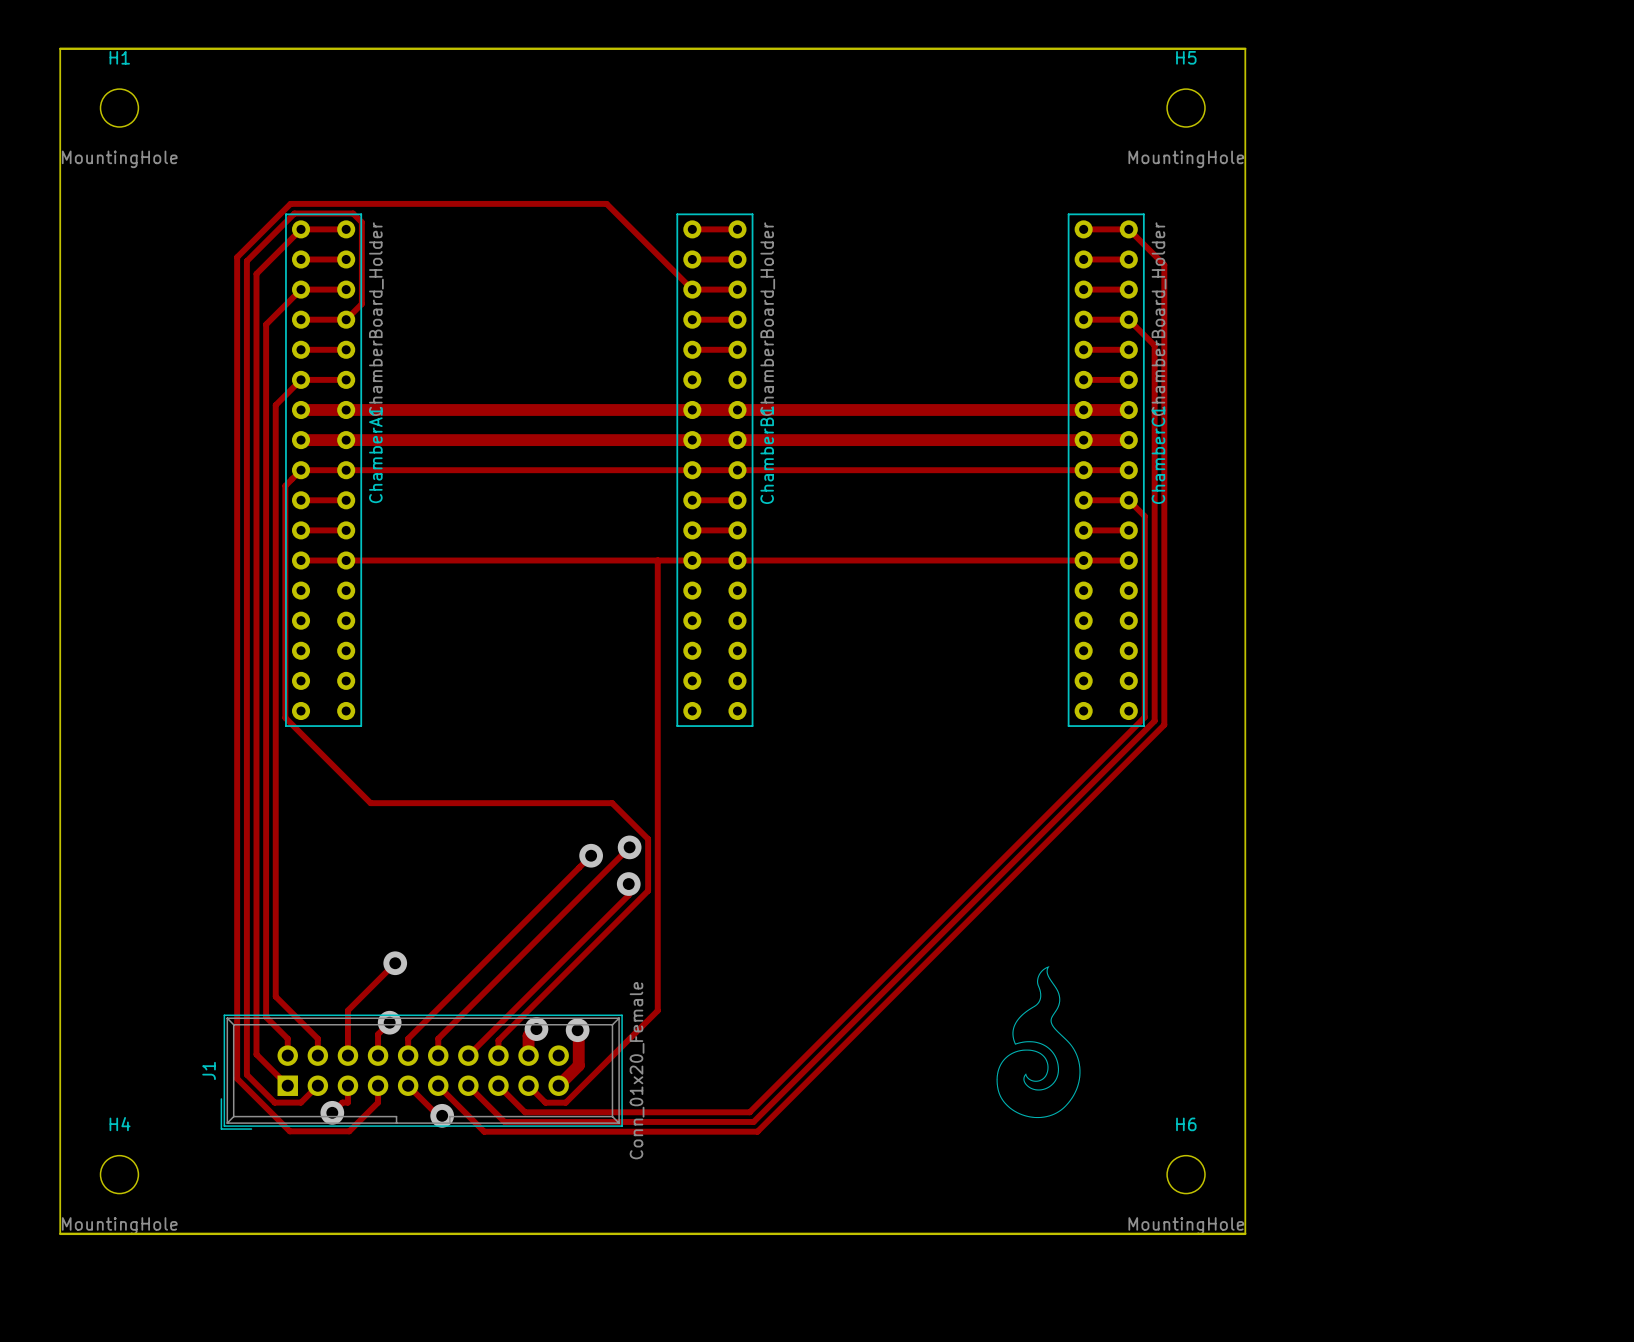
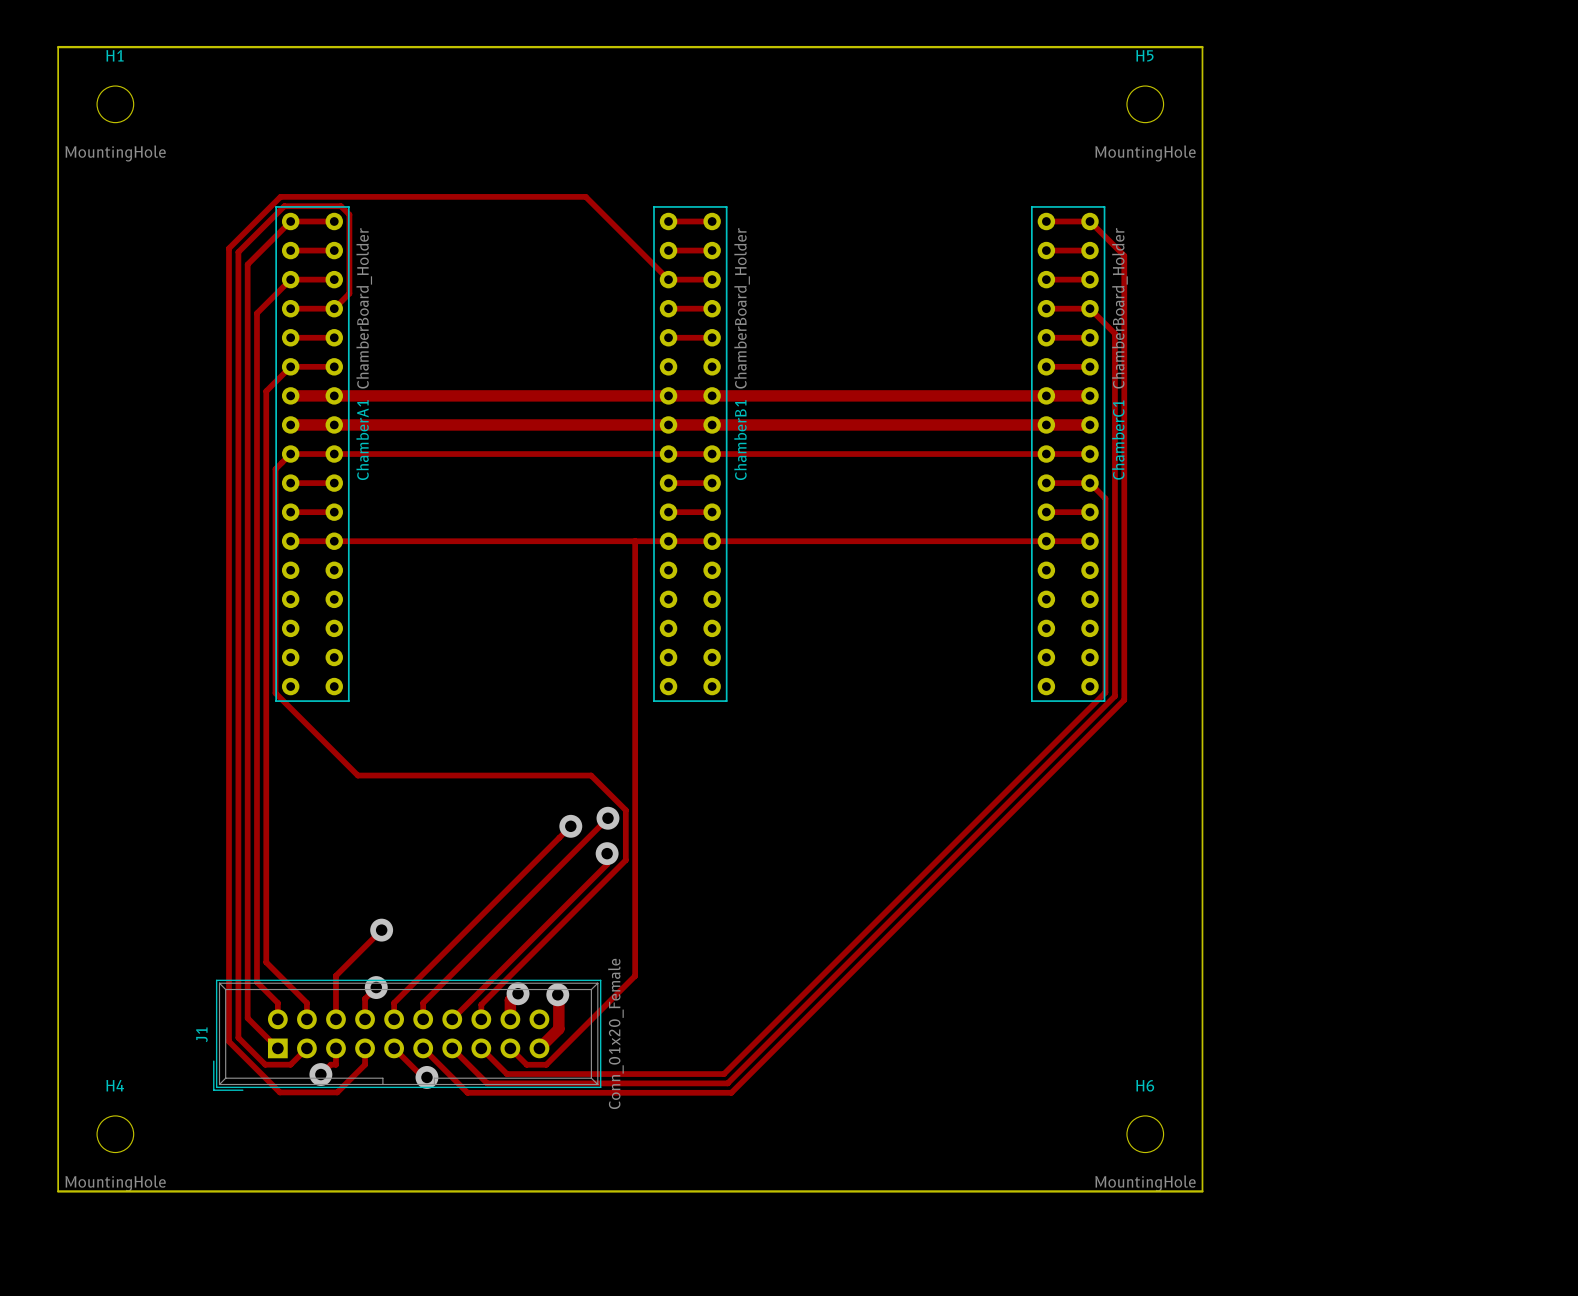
drawing: [996, 966, 1081, 1119] -> none

